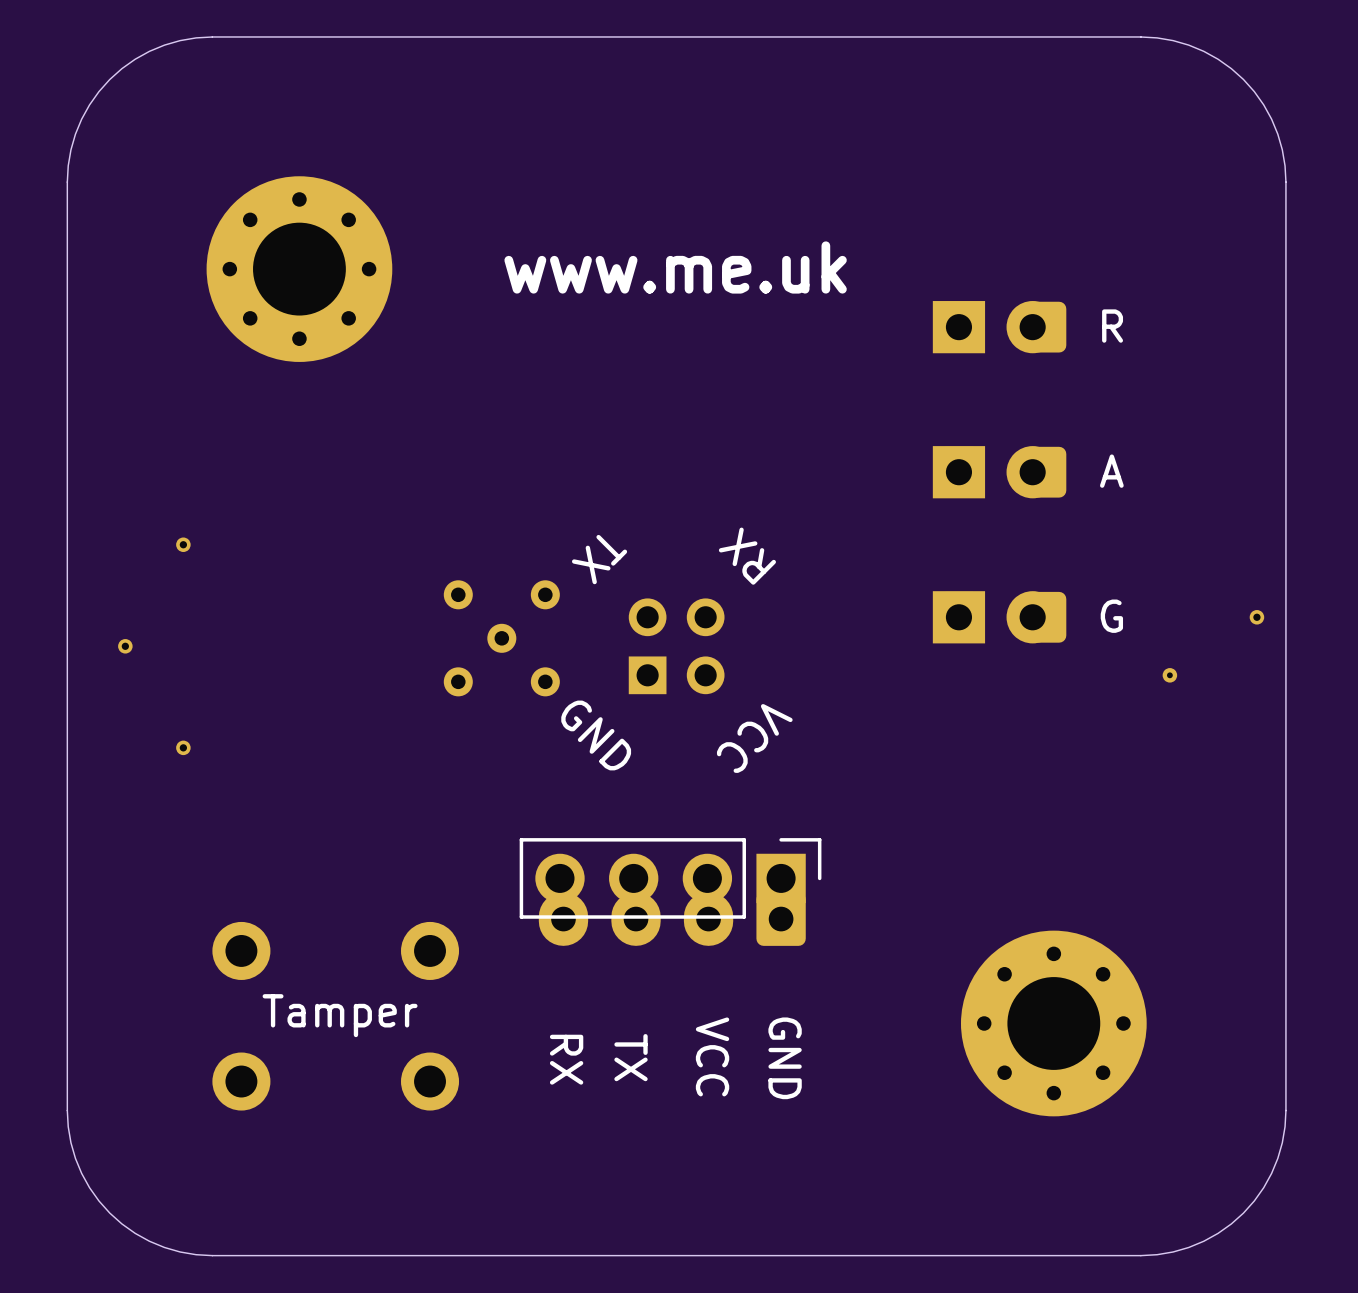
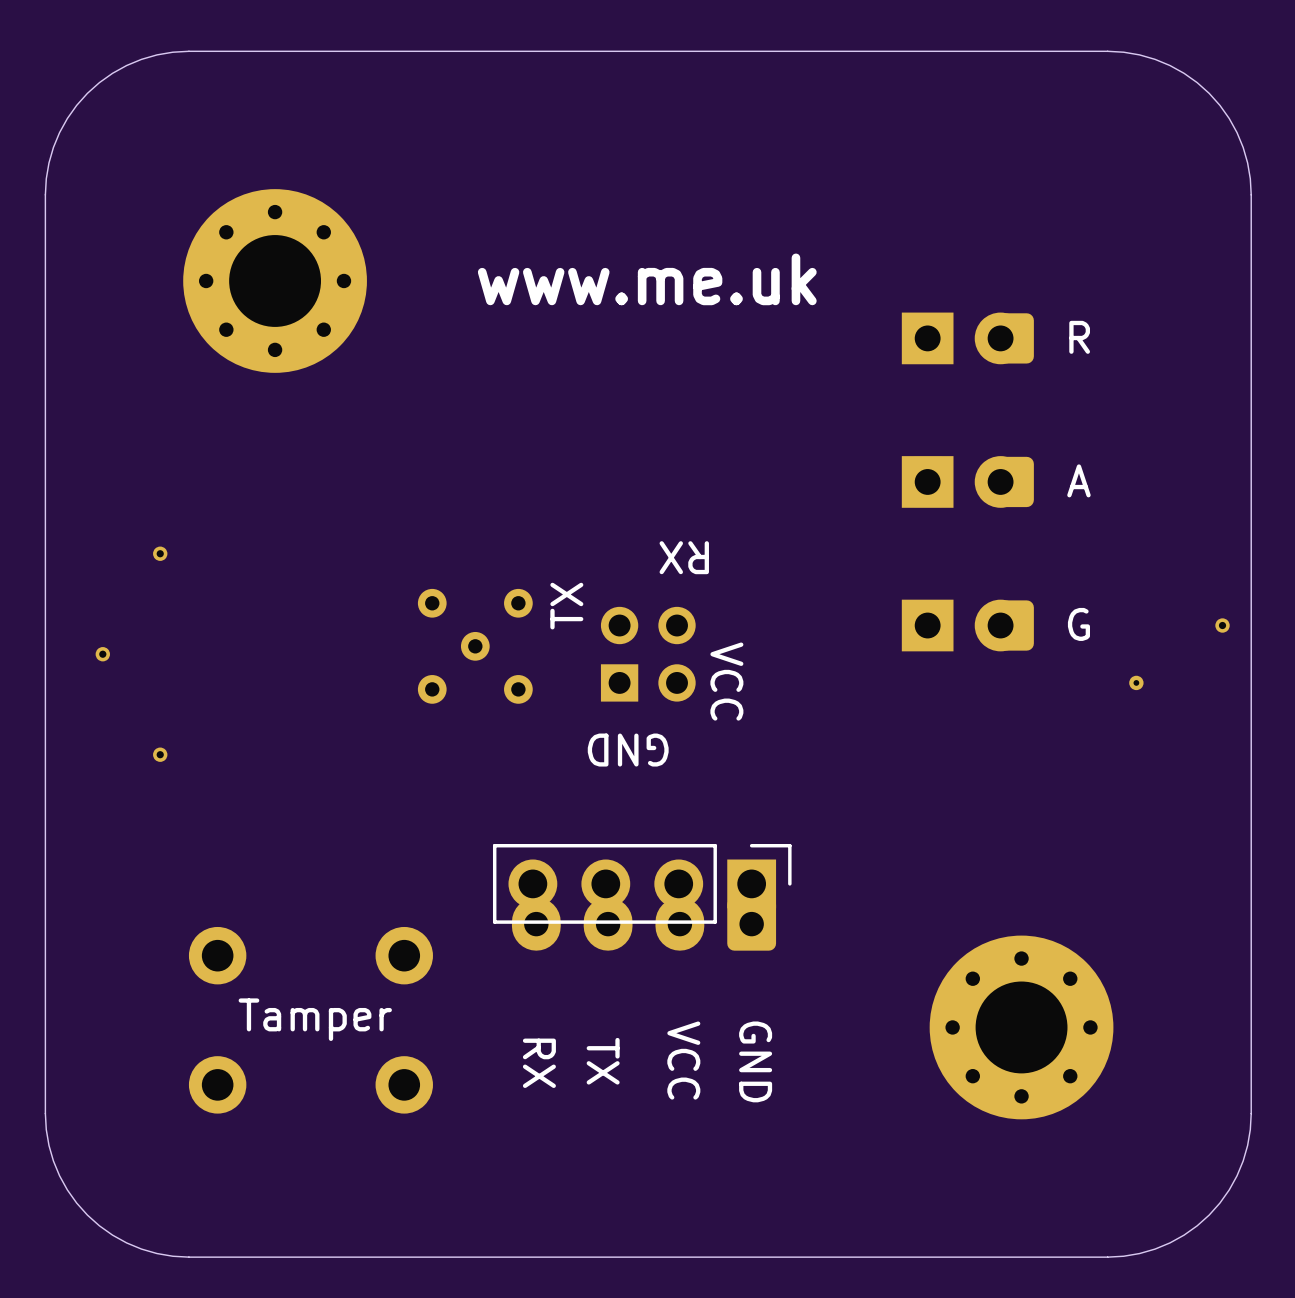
text rotation: 0° (747, 556) -> 45° counterclockwise (684, 557)
text rotation: 0° (599, 559) -> 135° clockwise (566, 606)
text rotation: 0° (596, 735) -> 135° clockwise (628, 750)
text rotation: 0° (754, 738) -> 45° counterclockwise (726, 681)

